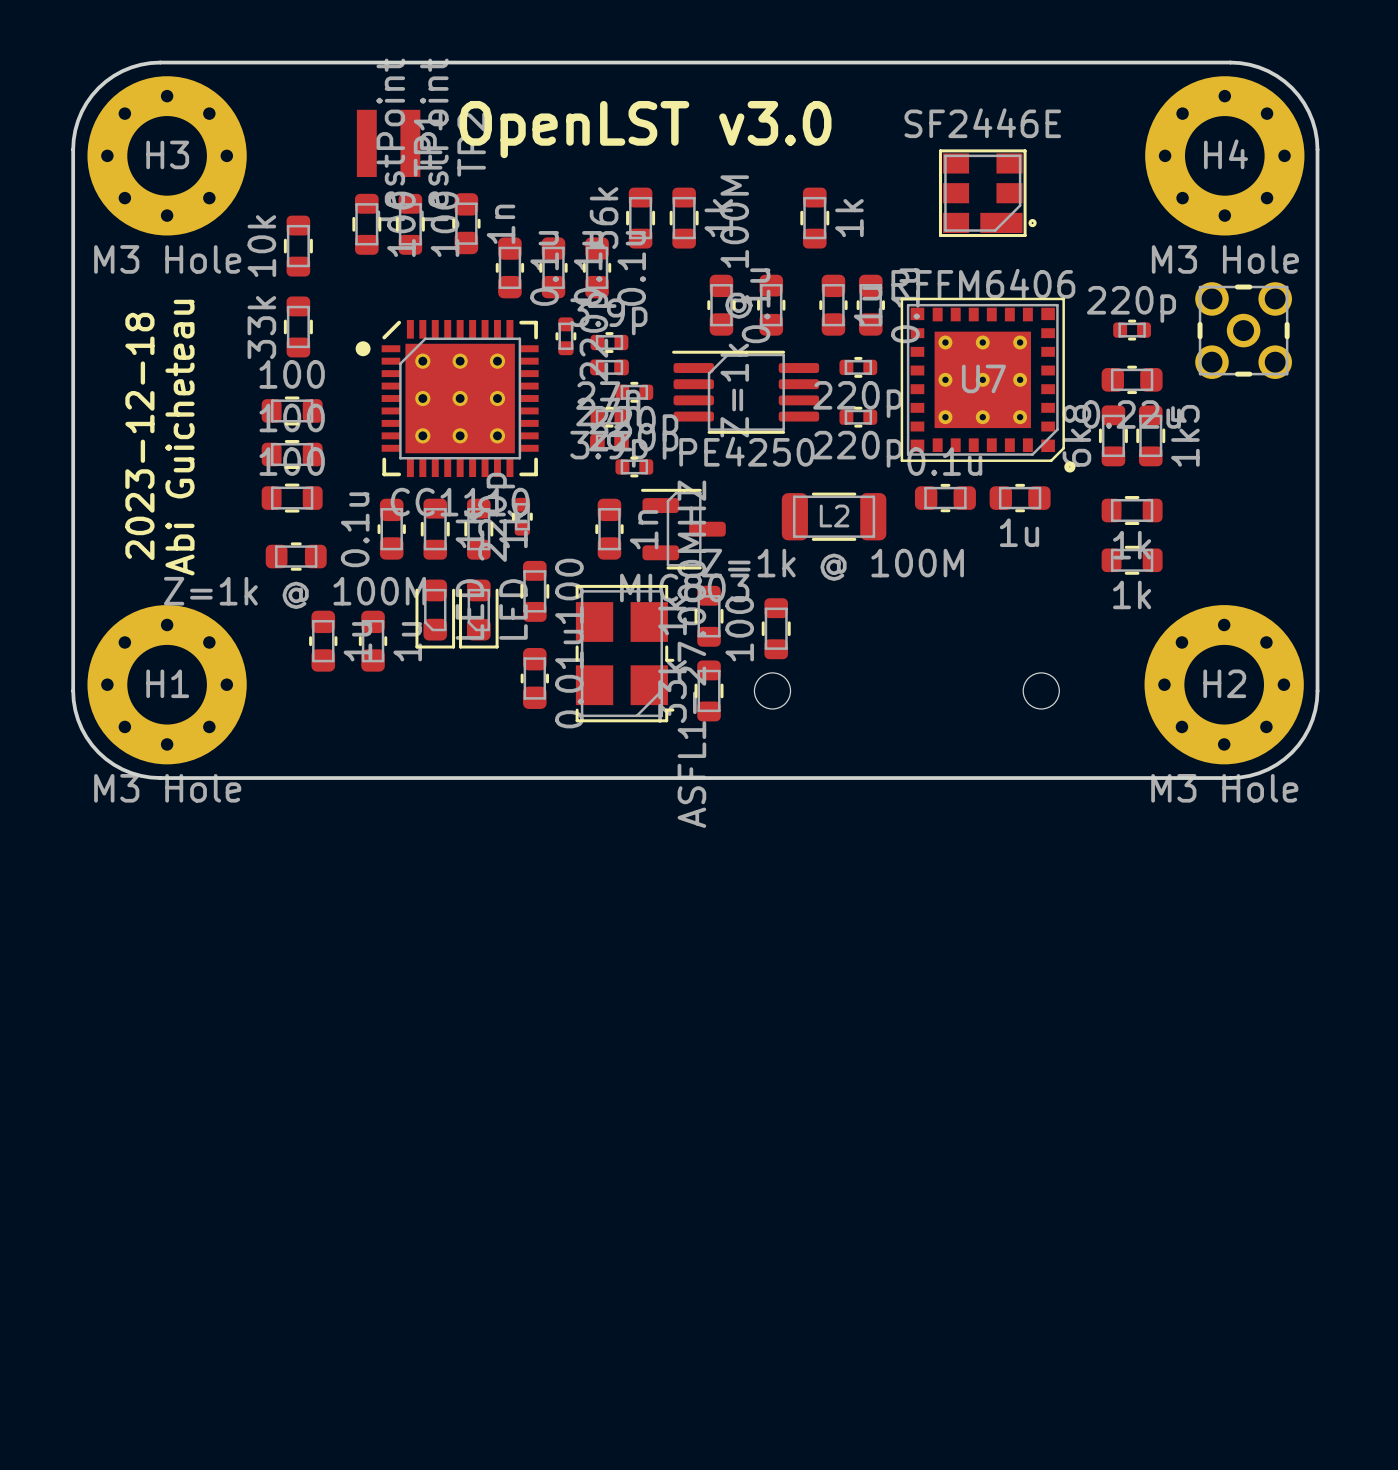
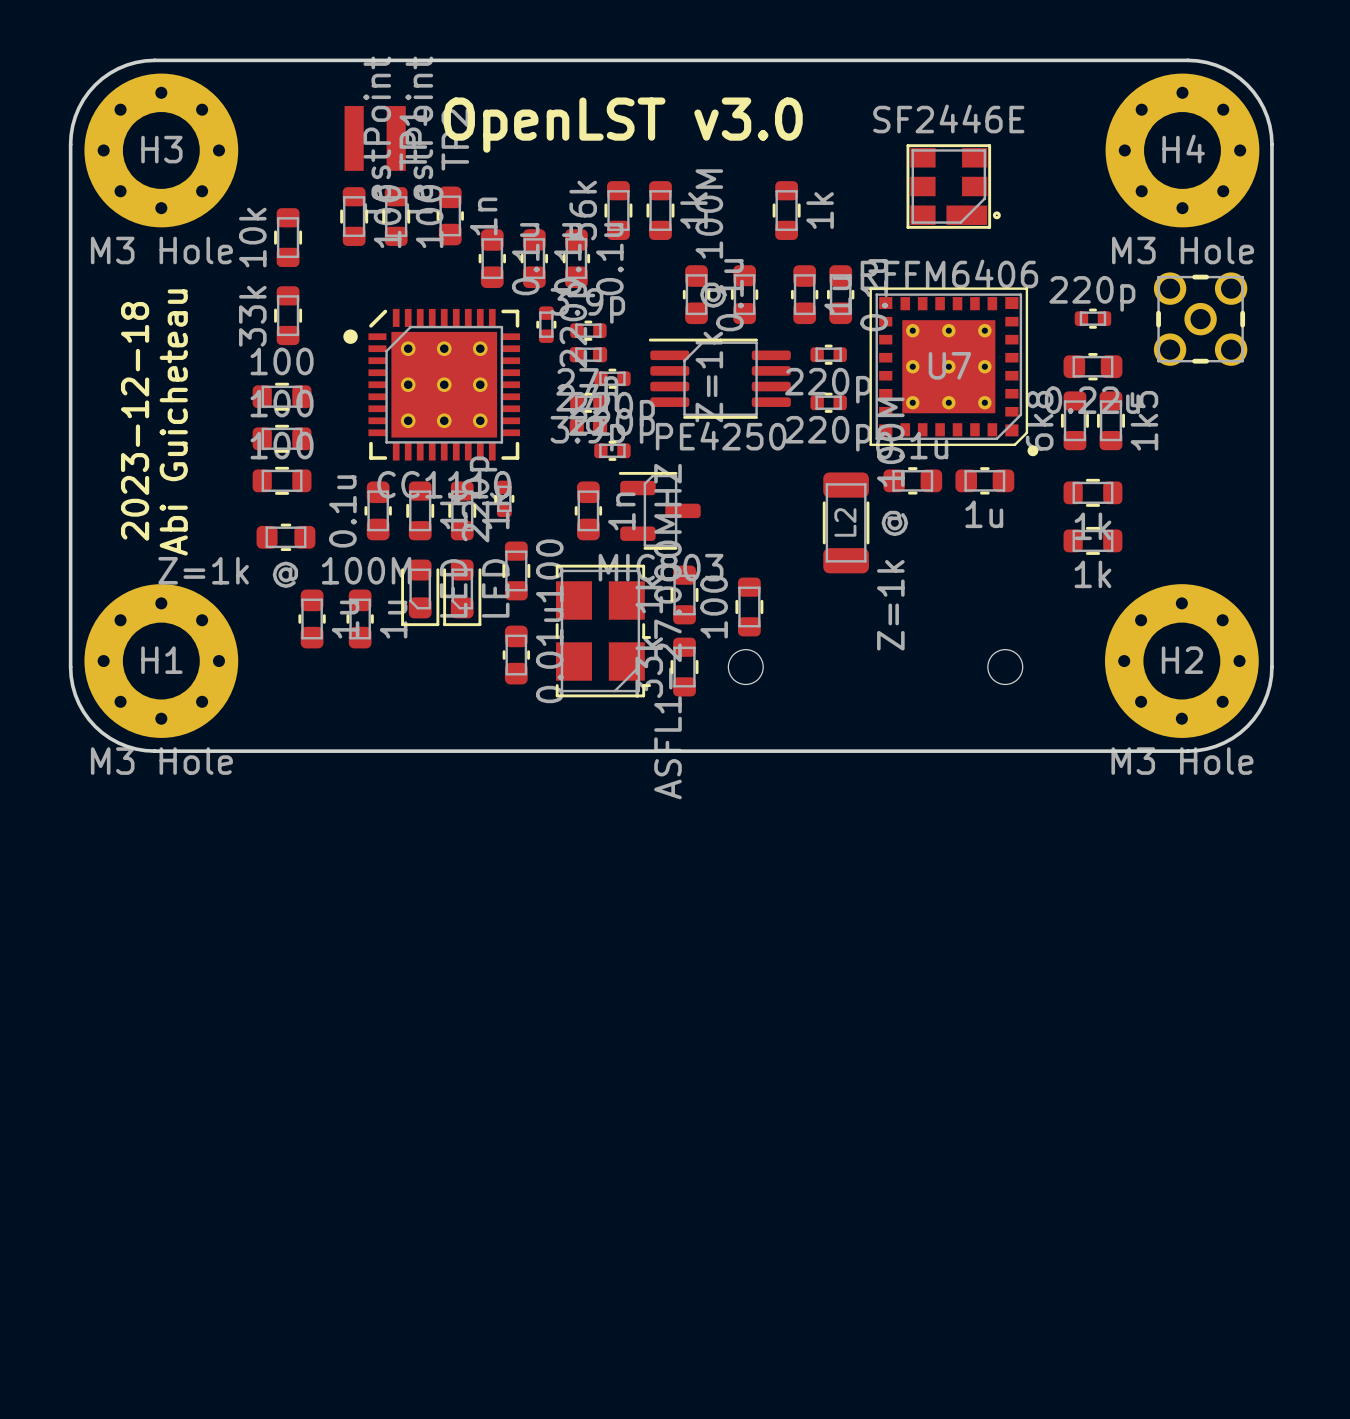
L2 rotation: 0° (834, 516) -> 90° clockwise (846, 522)
L2 value position: Z=1k @ 100M (832, 564) -> Z=1k @ 100M (892, 524)

